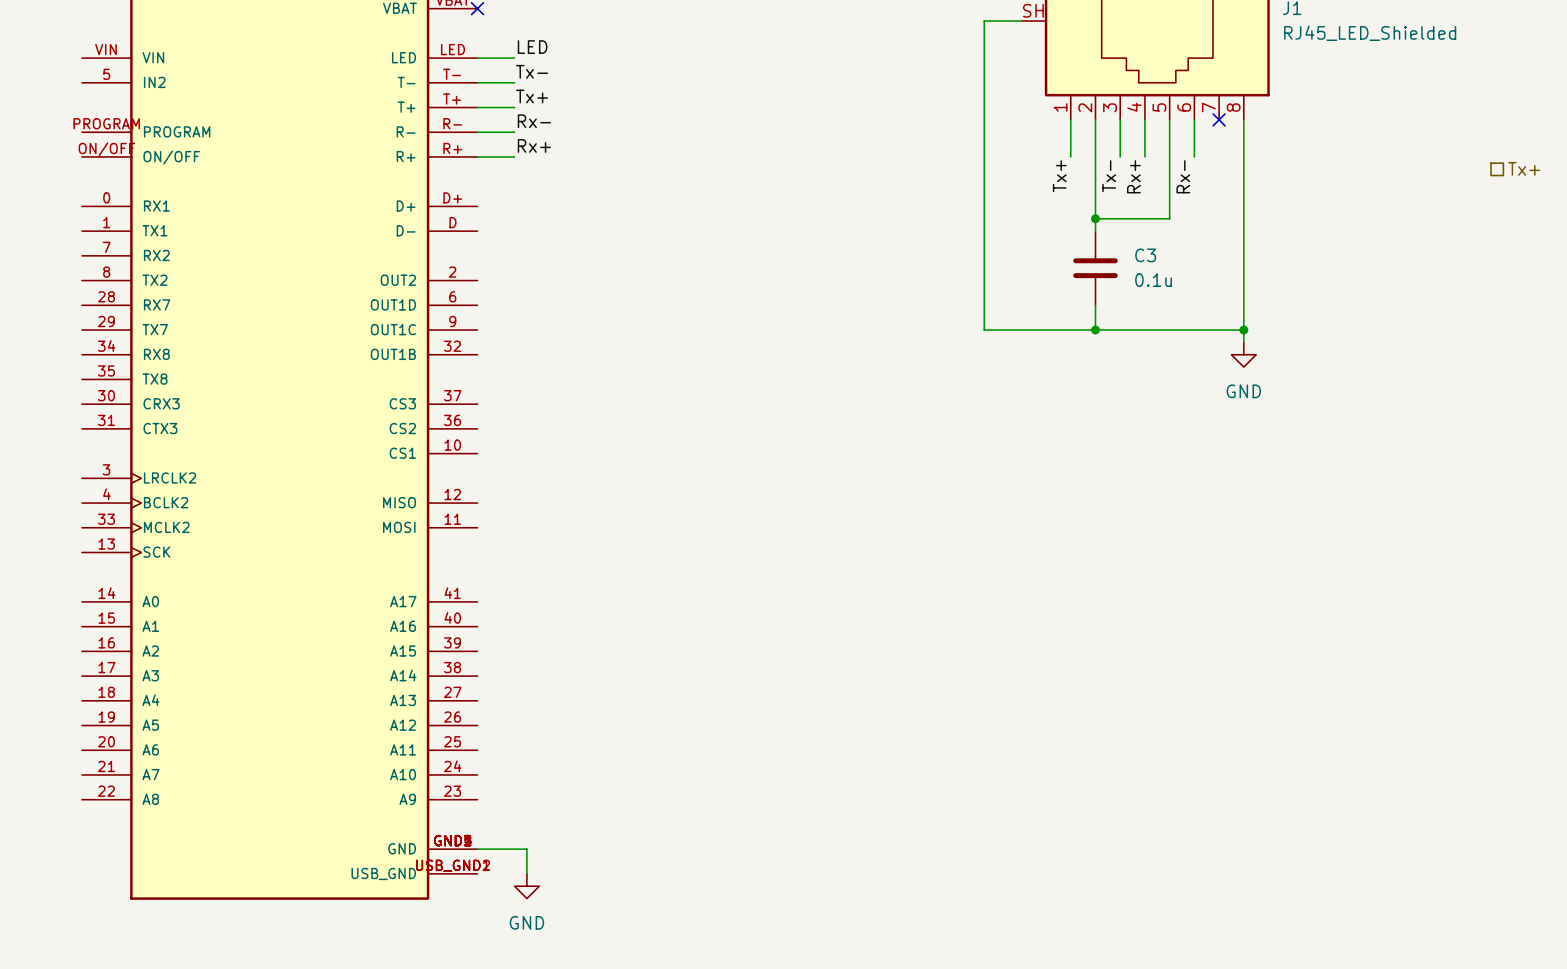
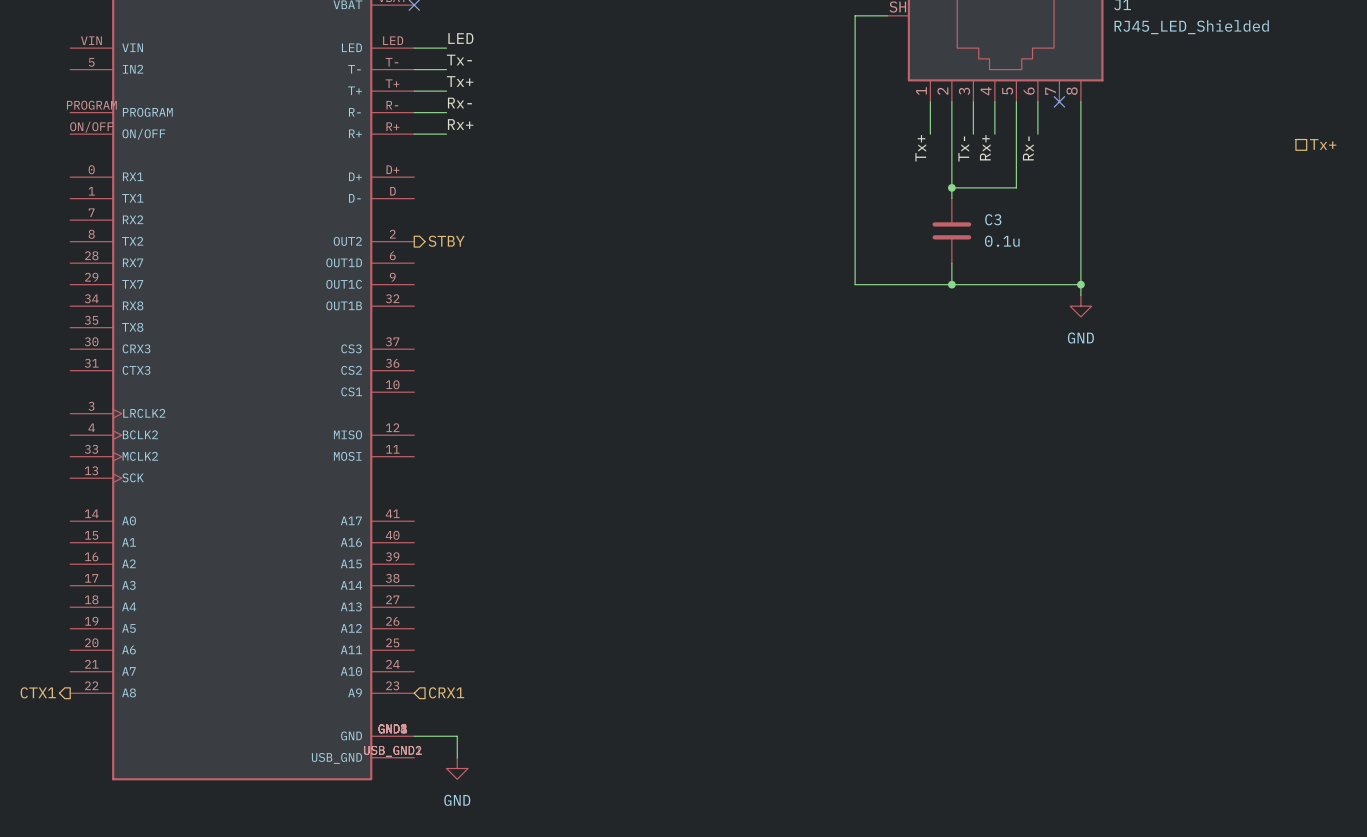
hierarchical label: none -> STBY (446, 241)
hierarchical label: none -> CTX1 (38, 692)
hierarchical label: none -> CRX1 (446, 692)

